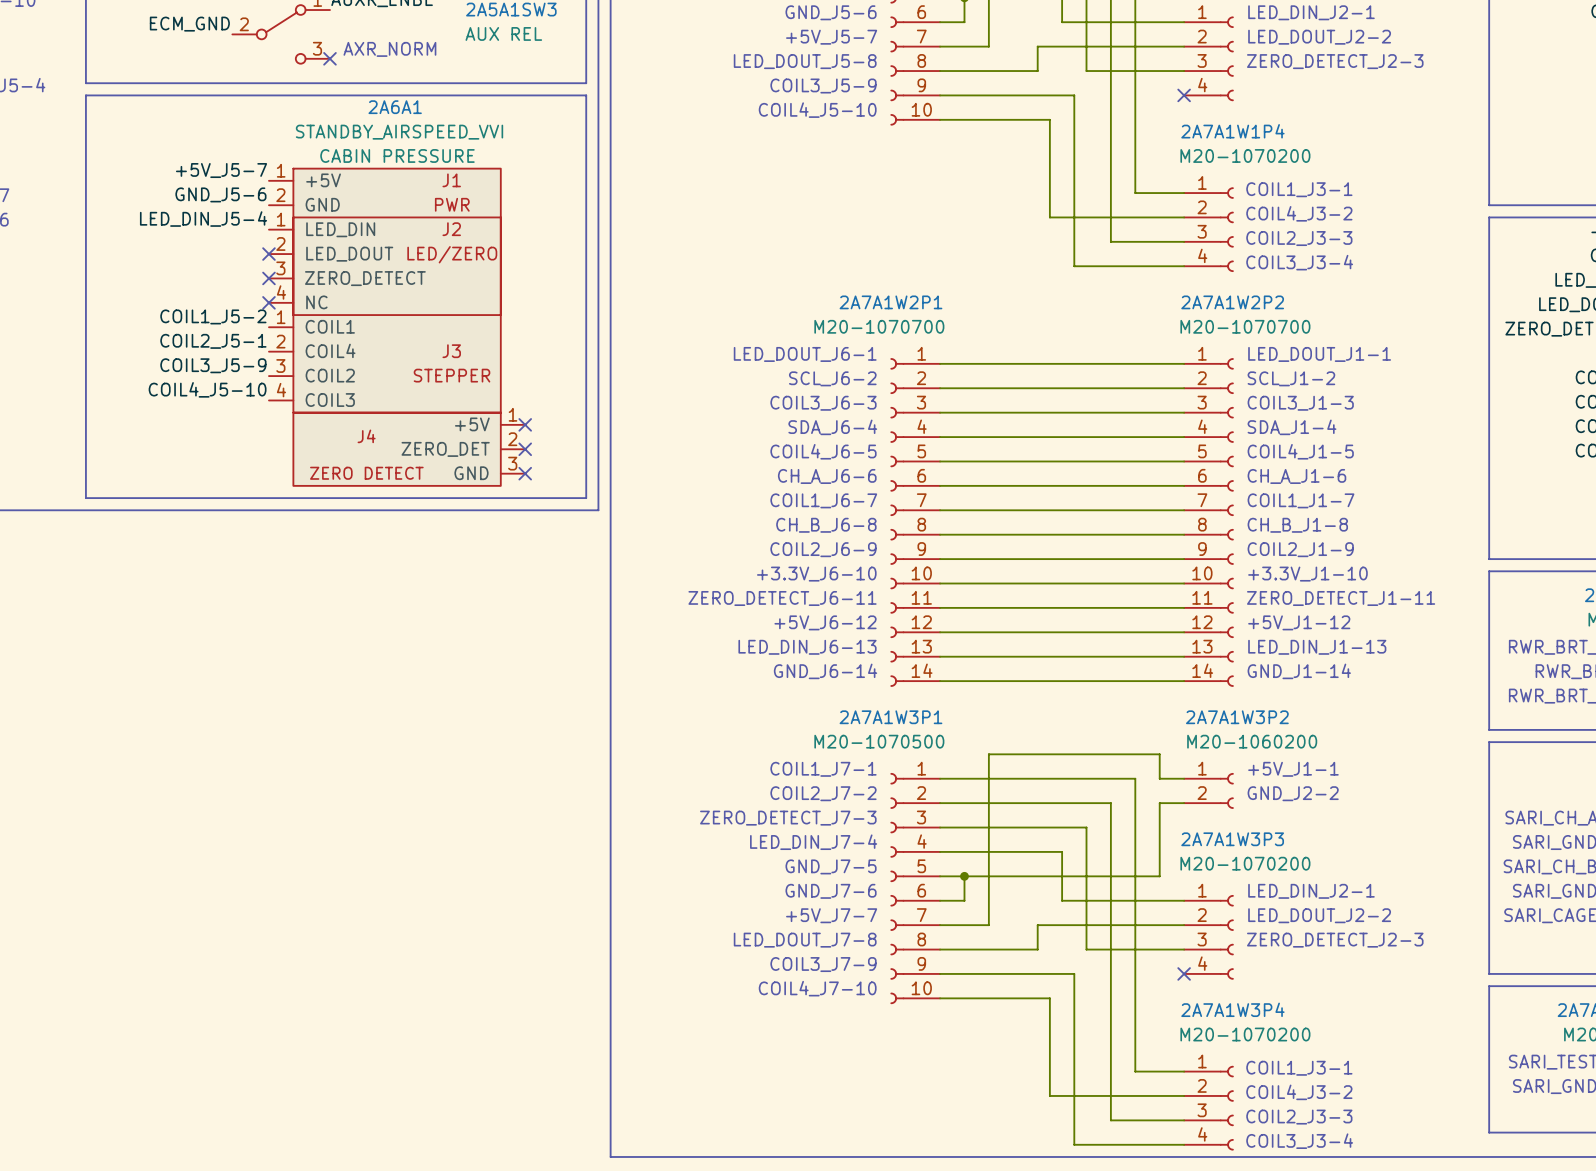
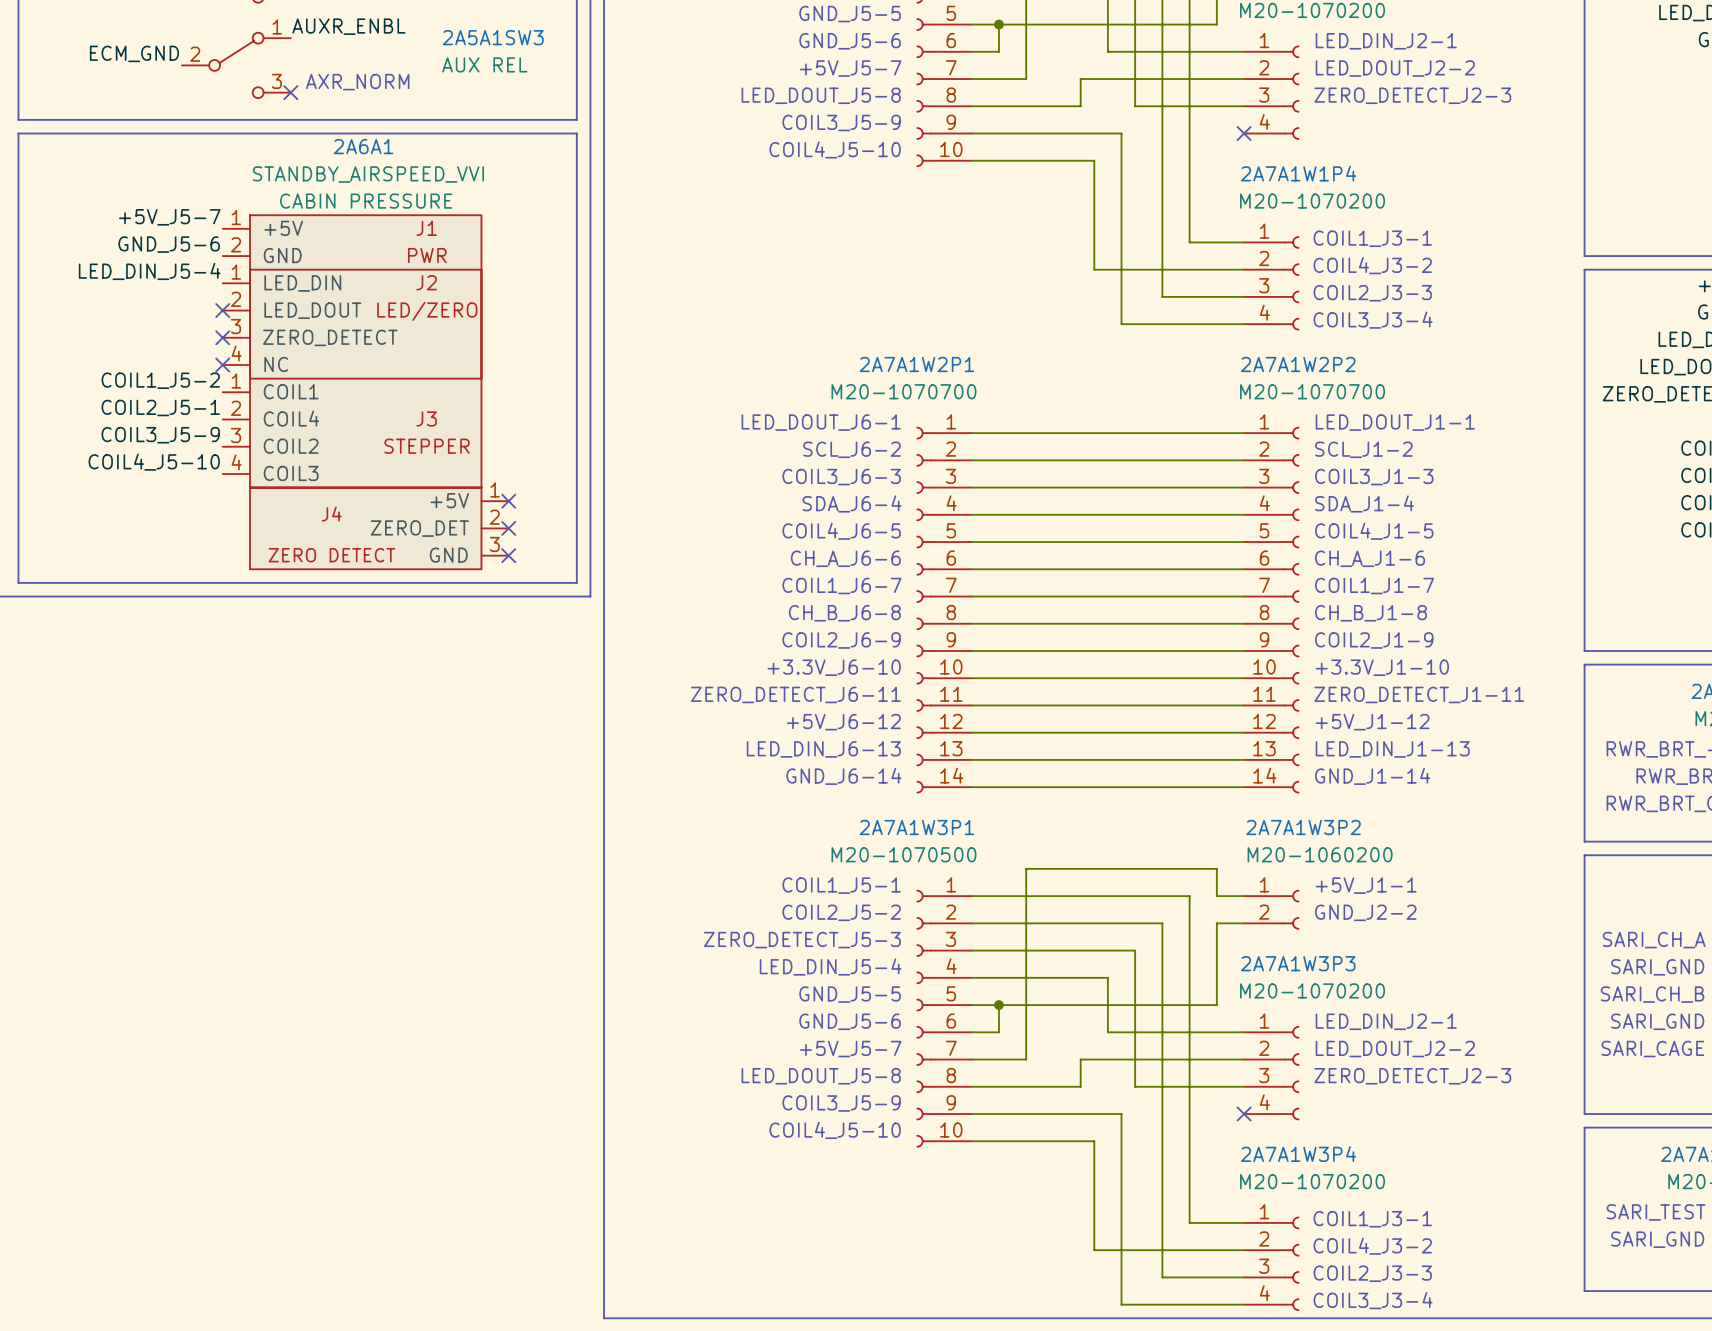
text: COIL1_J7-1 (823, 769) -> COIL1_J5-1 (841, 885)
text: COIL2_J7-2 (823, 793) -> COIL2_J5-2 (841, 912)
text: ZERO_DETECT_J7-3 (788, 818) -> ZERO_DETECT_J5-3 (802, 940)
text: LED_DIN_J7-4 (813, 842) -> LED_DIN_J5-4 (830, 967)
text: GND_J7-5 (831, 866) -> GND_J5-5 (850, 994)
text: GND_J7-6 (831, 891) -> GND_J5-6 (850, 1021)
text: +5V_J7-7 (831, 915) -> +5V_J5-7 (850, 1049)
text: LED_DOUT_J7-8 (805, 940) -> LED_DOUT_J5-8 (821, 1076)
text: COIL3_J7-9 (823, 964) -> COIL3_J5-9 (841, 1103)
text: COIL4_J7-10 (817, 988) -> COIL4_J5-10 (835, 1130)

